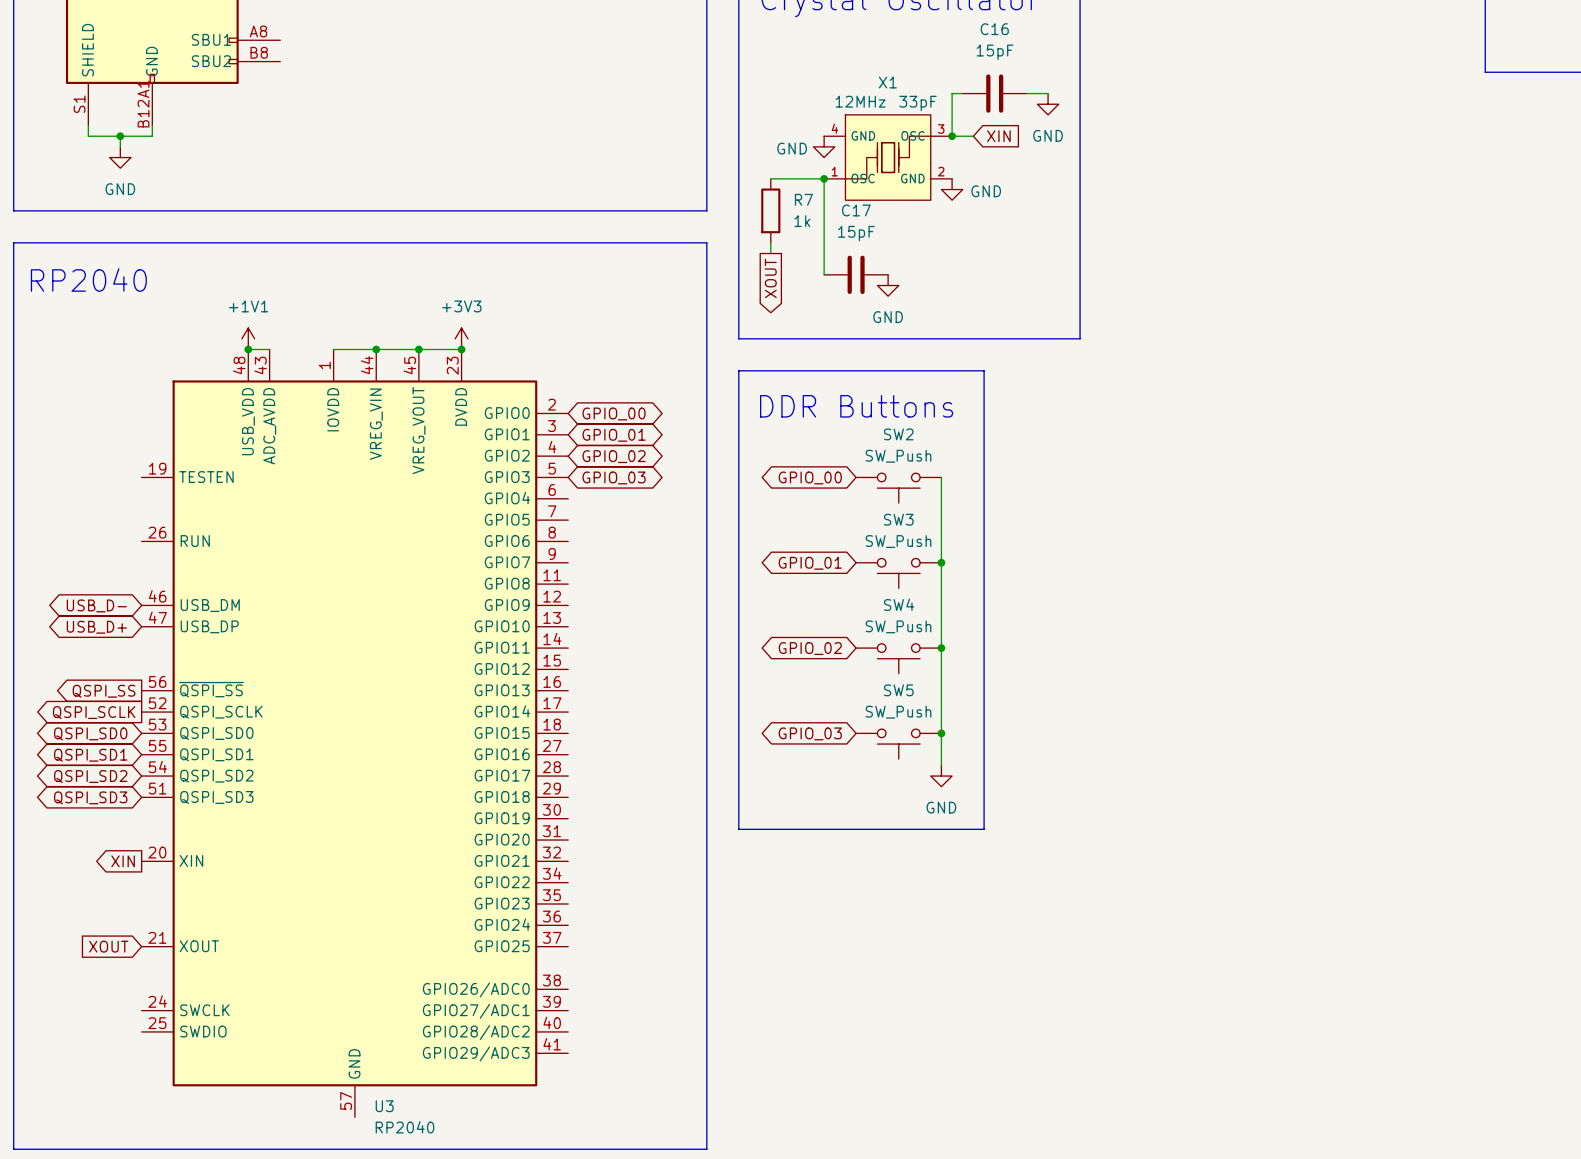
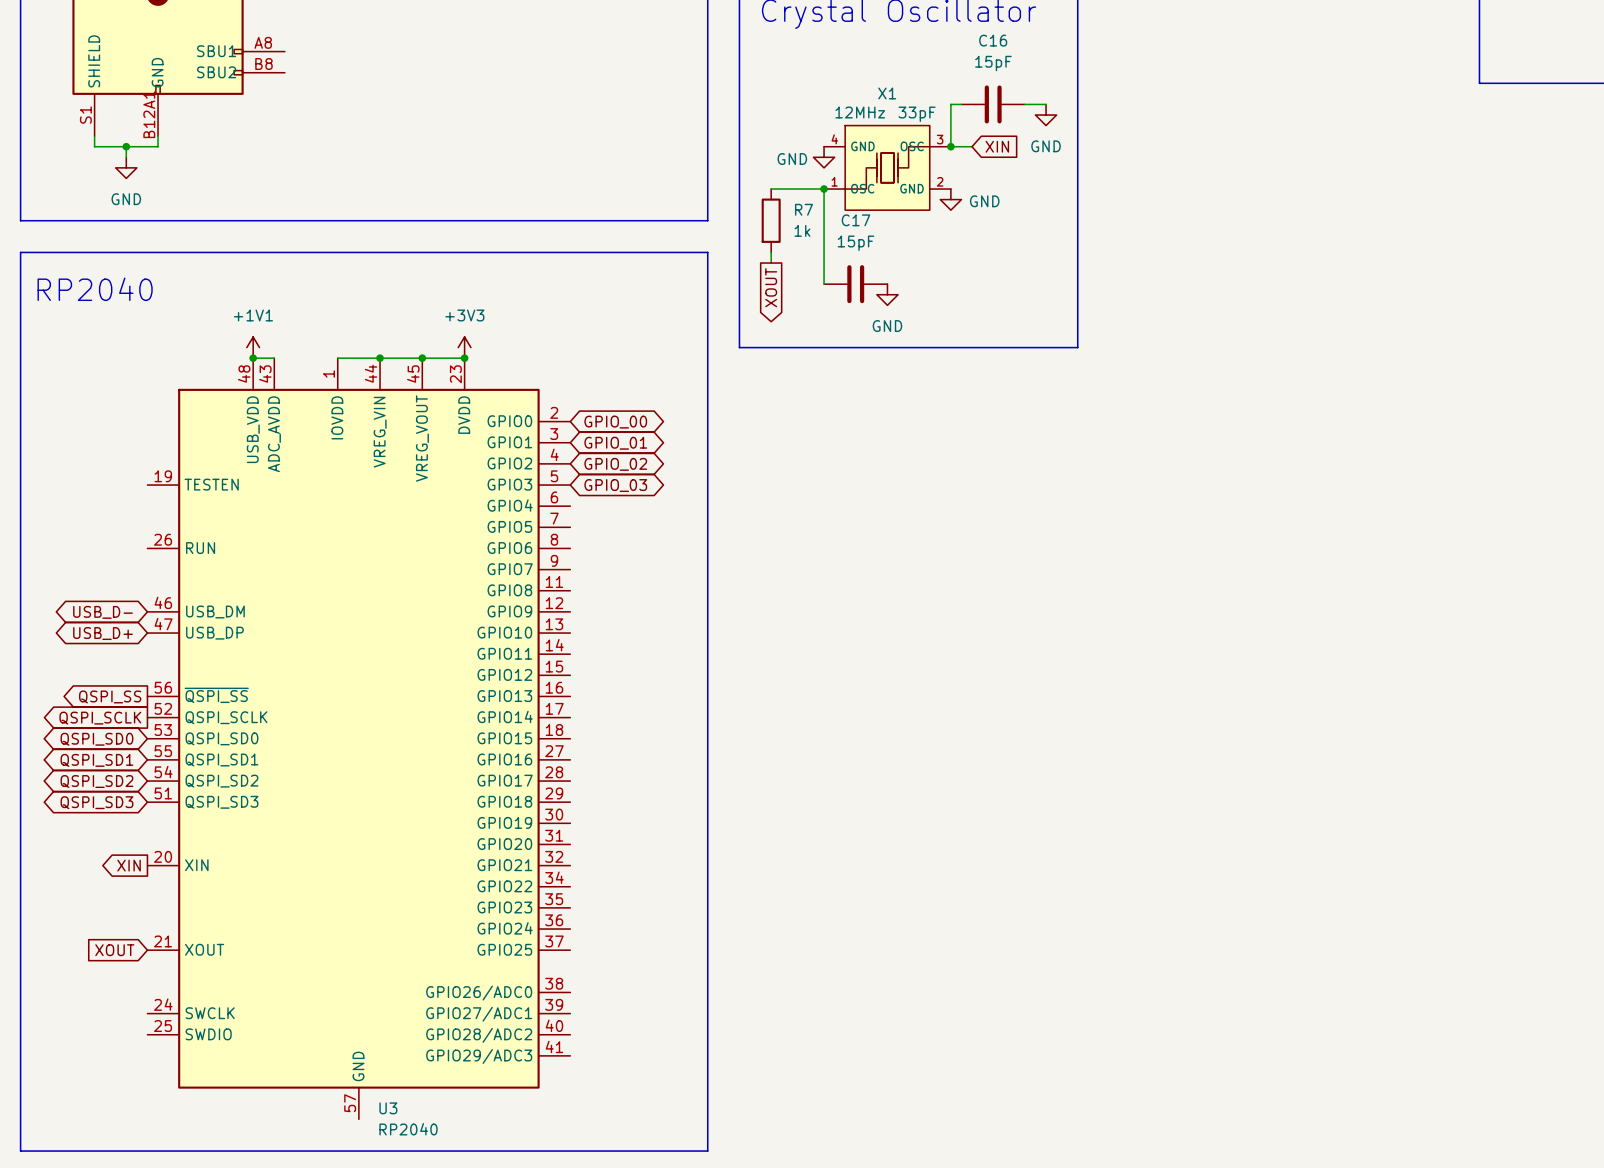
line: (738, 370) (984, 370) (984, 829) (738, 829) (738, 370) -> none
text: DDR Buttons (856, 406) -> none
global label: GPIO_00 (810, 477) -> none
wire: (941, 477) (941, 765) -> none
SW2: SW_Push (898, 488) -> none
junction: (941, 562) -> none
global label: GPIO_01 (810, 563) -> none
SW3: SW_Push (898, 573) -> none
global label: GPIO_02 (810, 648) -> none
junction: (941, 648) -> none
SW4: SW_Push (898, 658) -> none
global label: GPIO_03 (810, 733) -> none
junction: (941, 733) -> none
SW5: SW_Push (898, 744) -> none
power symbol: GND (941, 776) -> none

